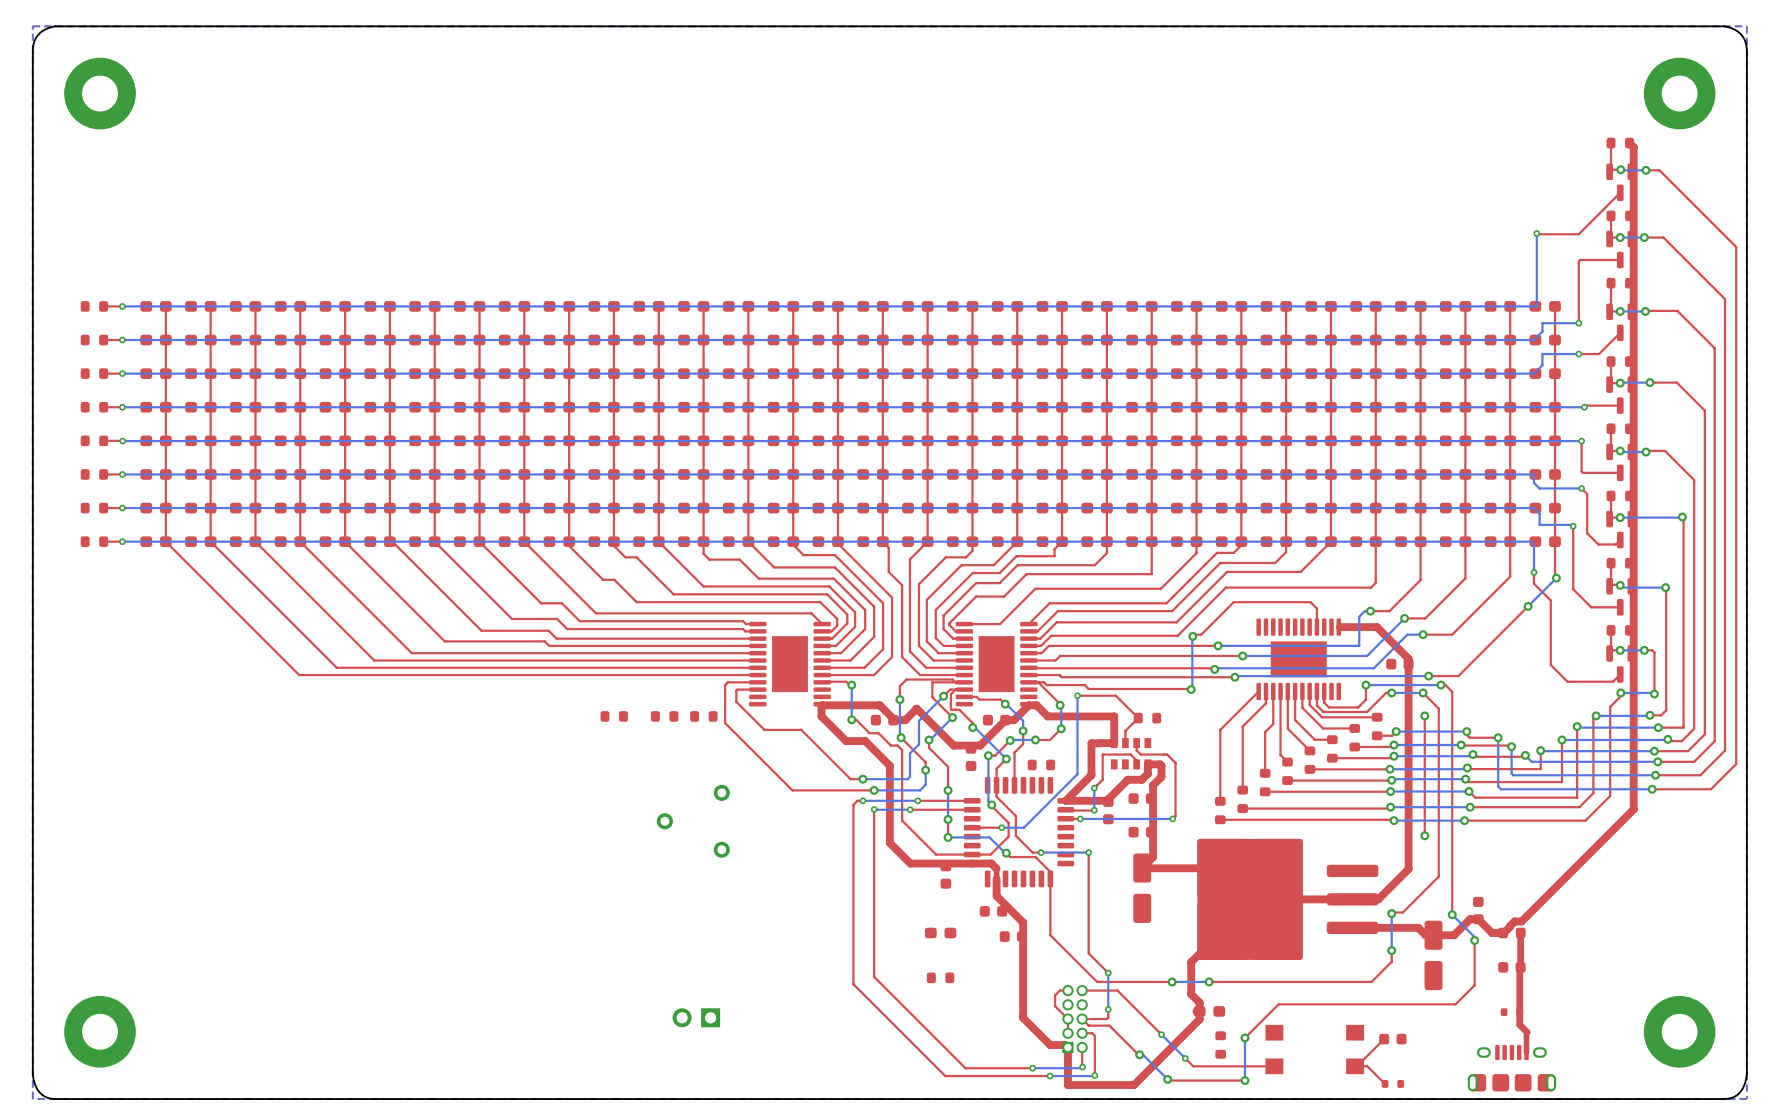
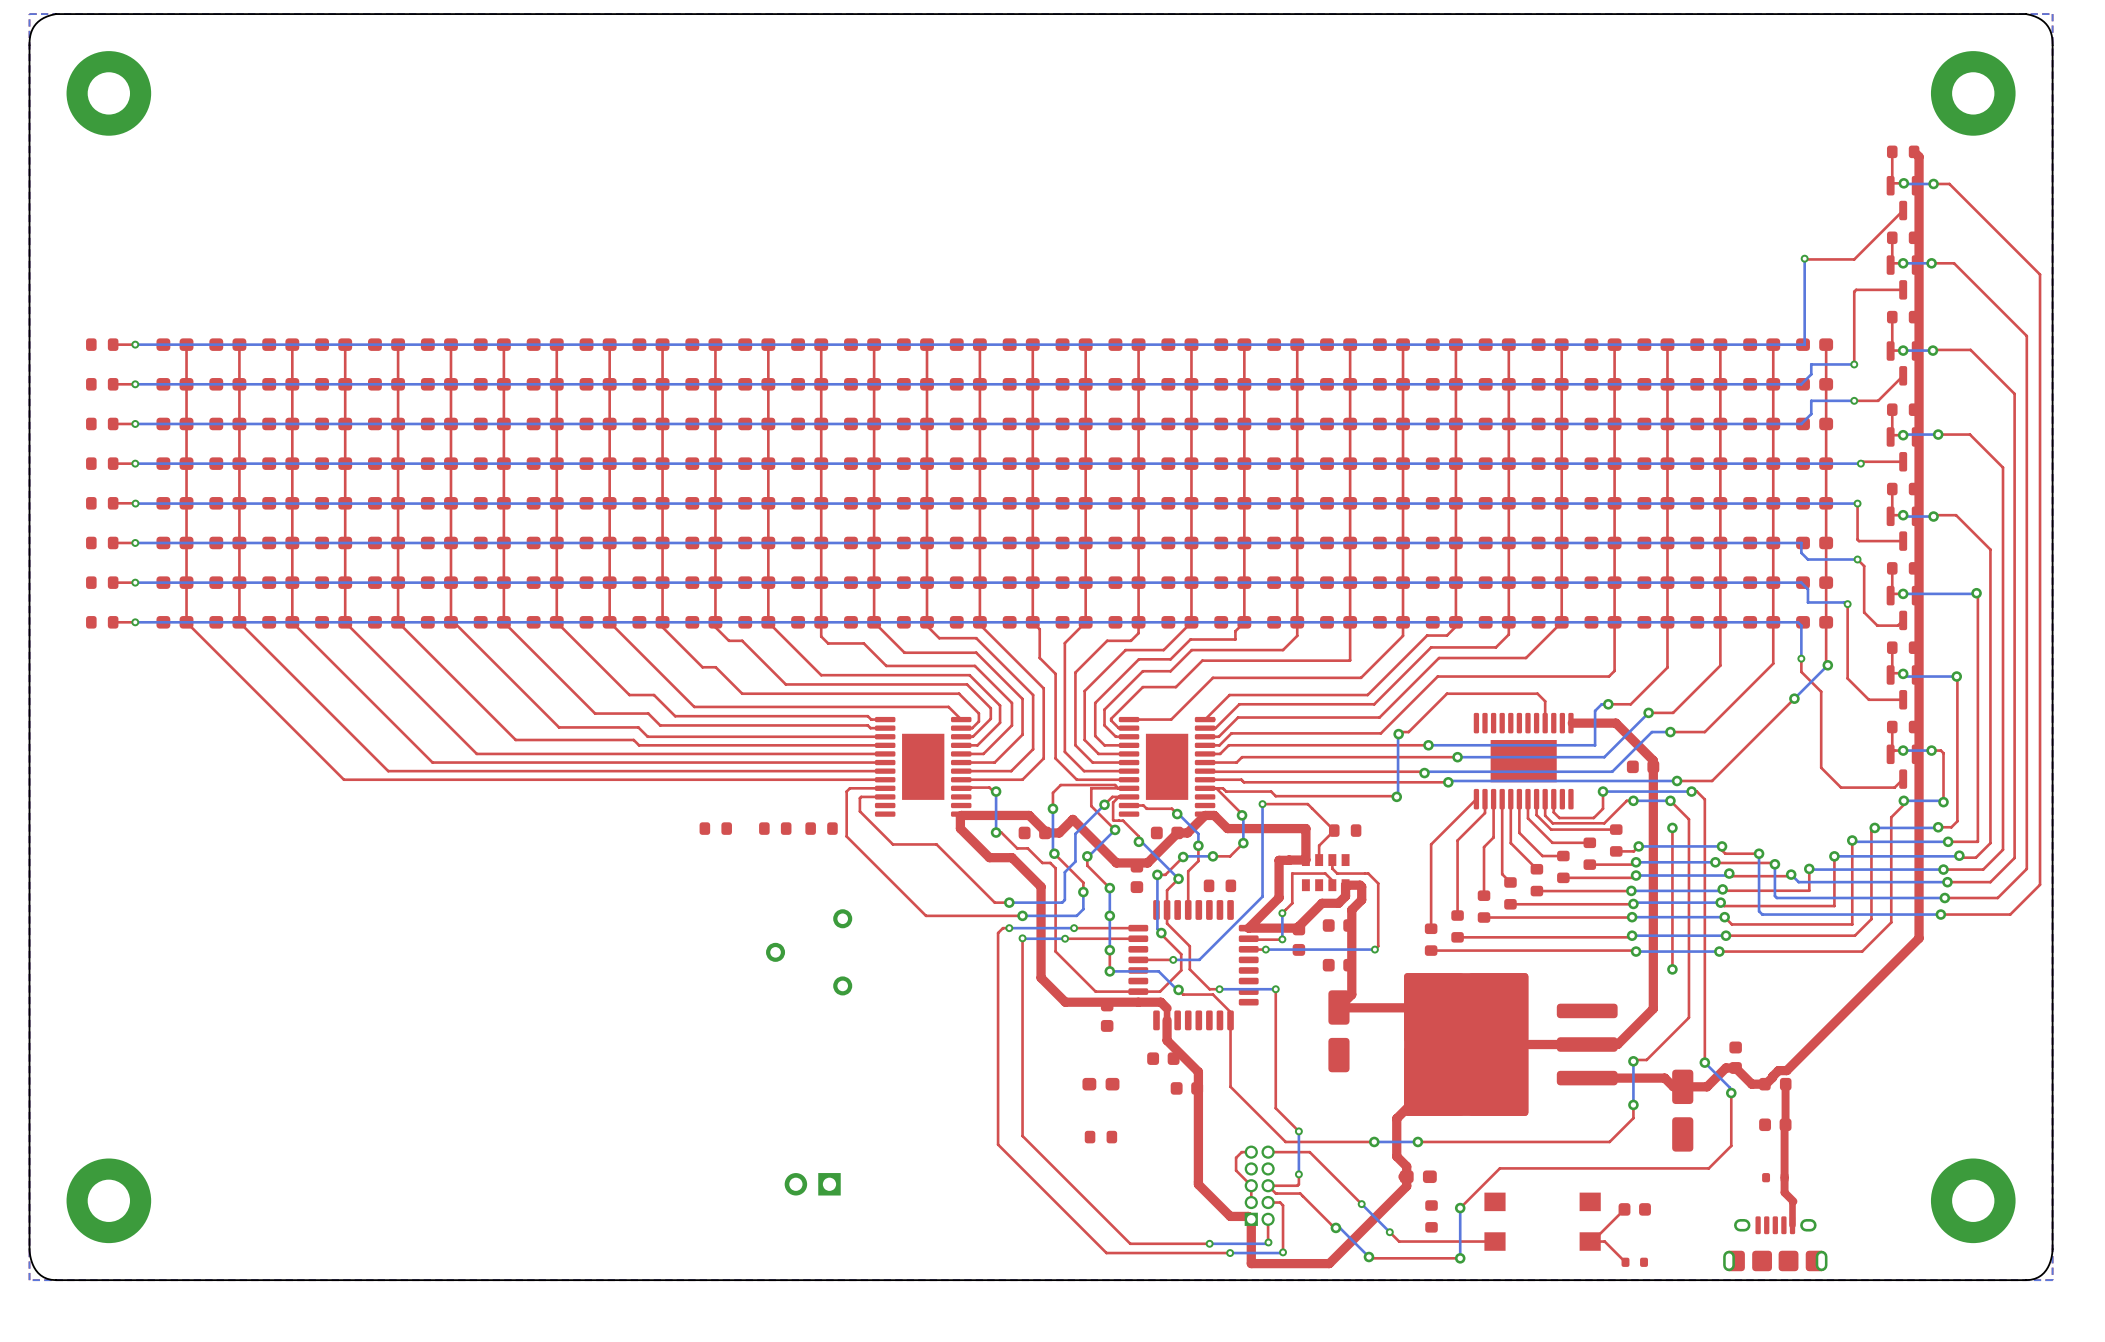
top track: (948, 766) (948, 790) -> none
bottom track: none -> (1109, 888) (1109, 915)
via: none -> (1109, 888)

